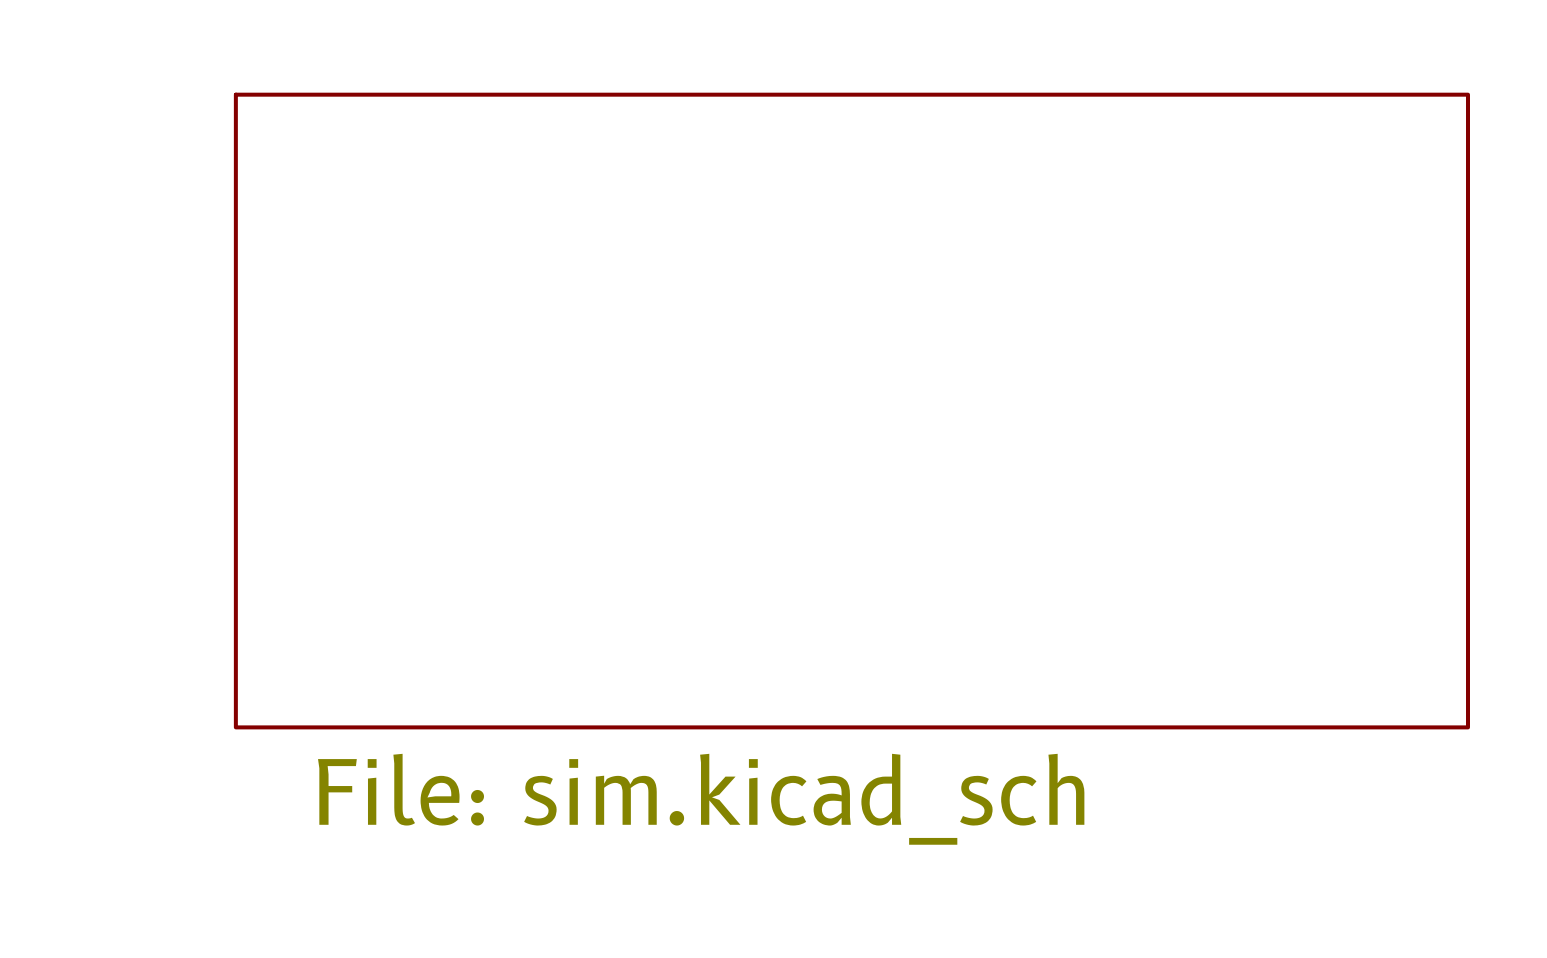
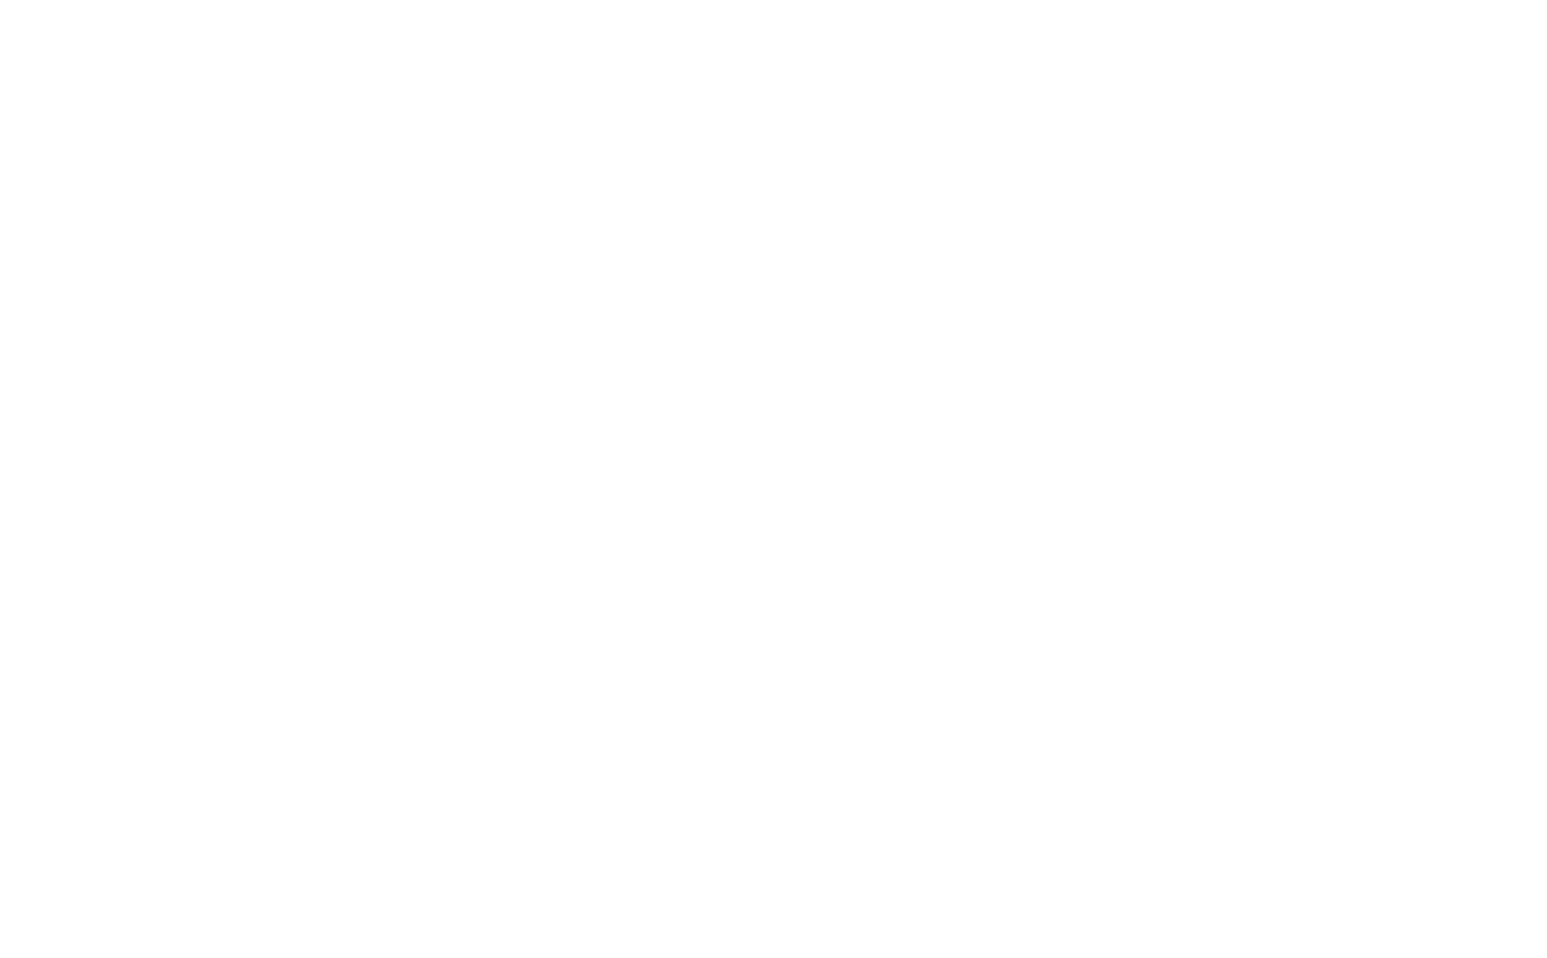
sheet: File: sim.kicad_sch (851, 411) -> none

